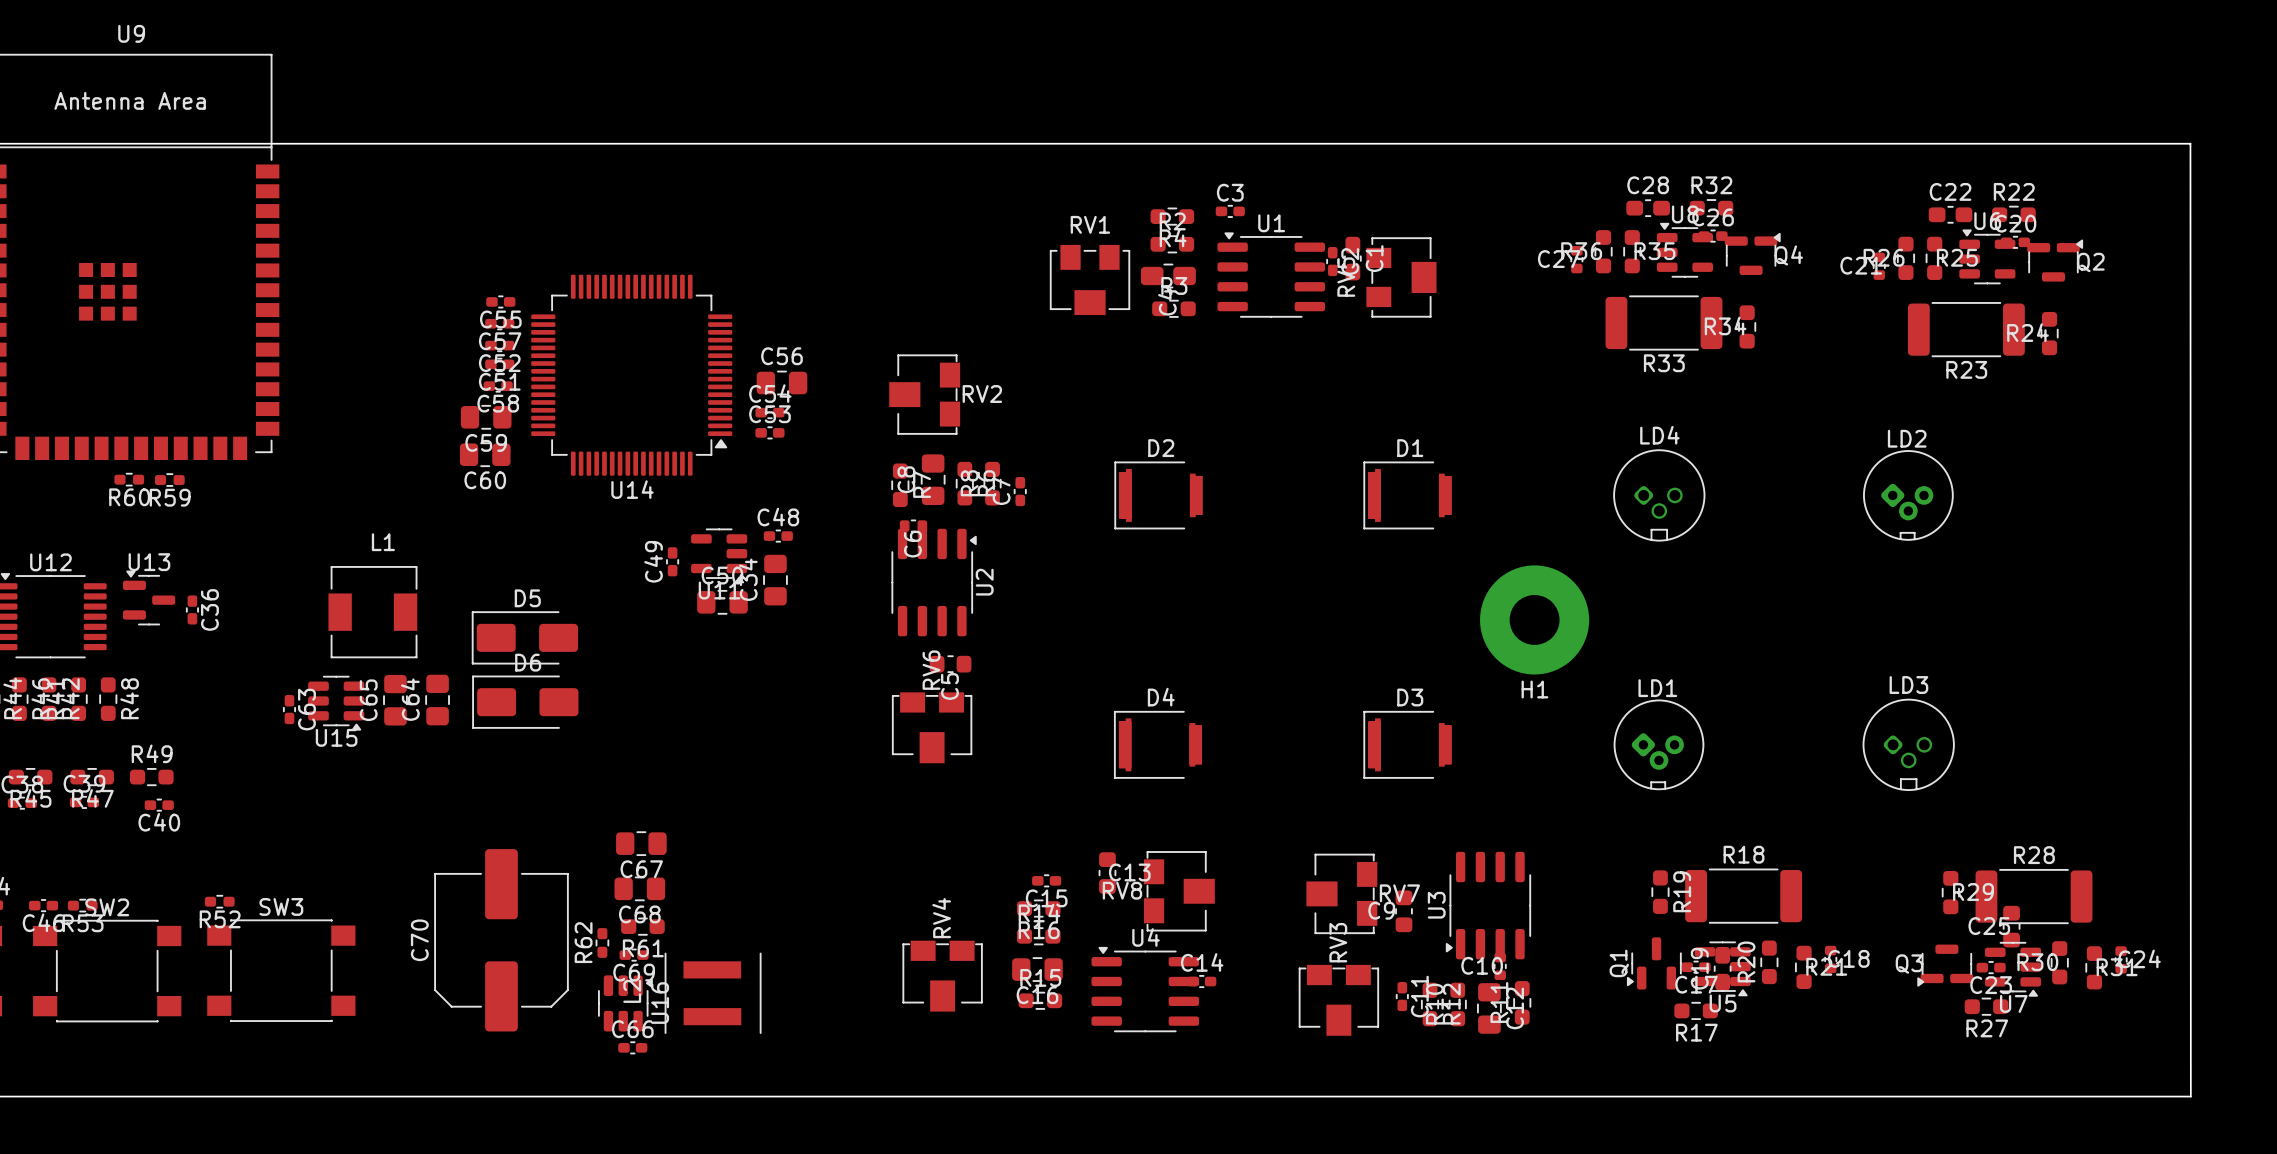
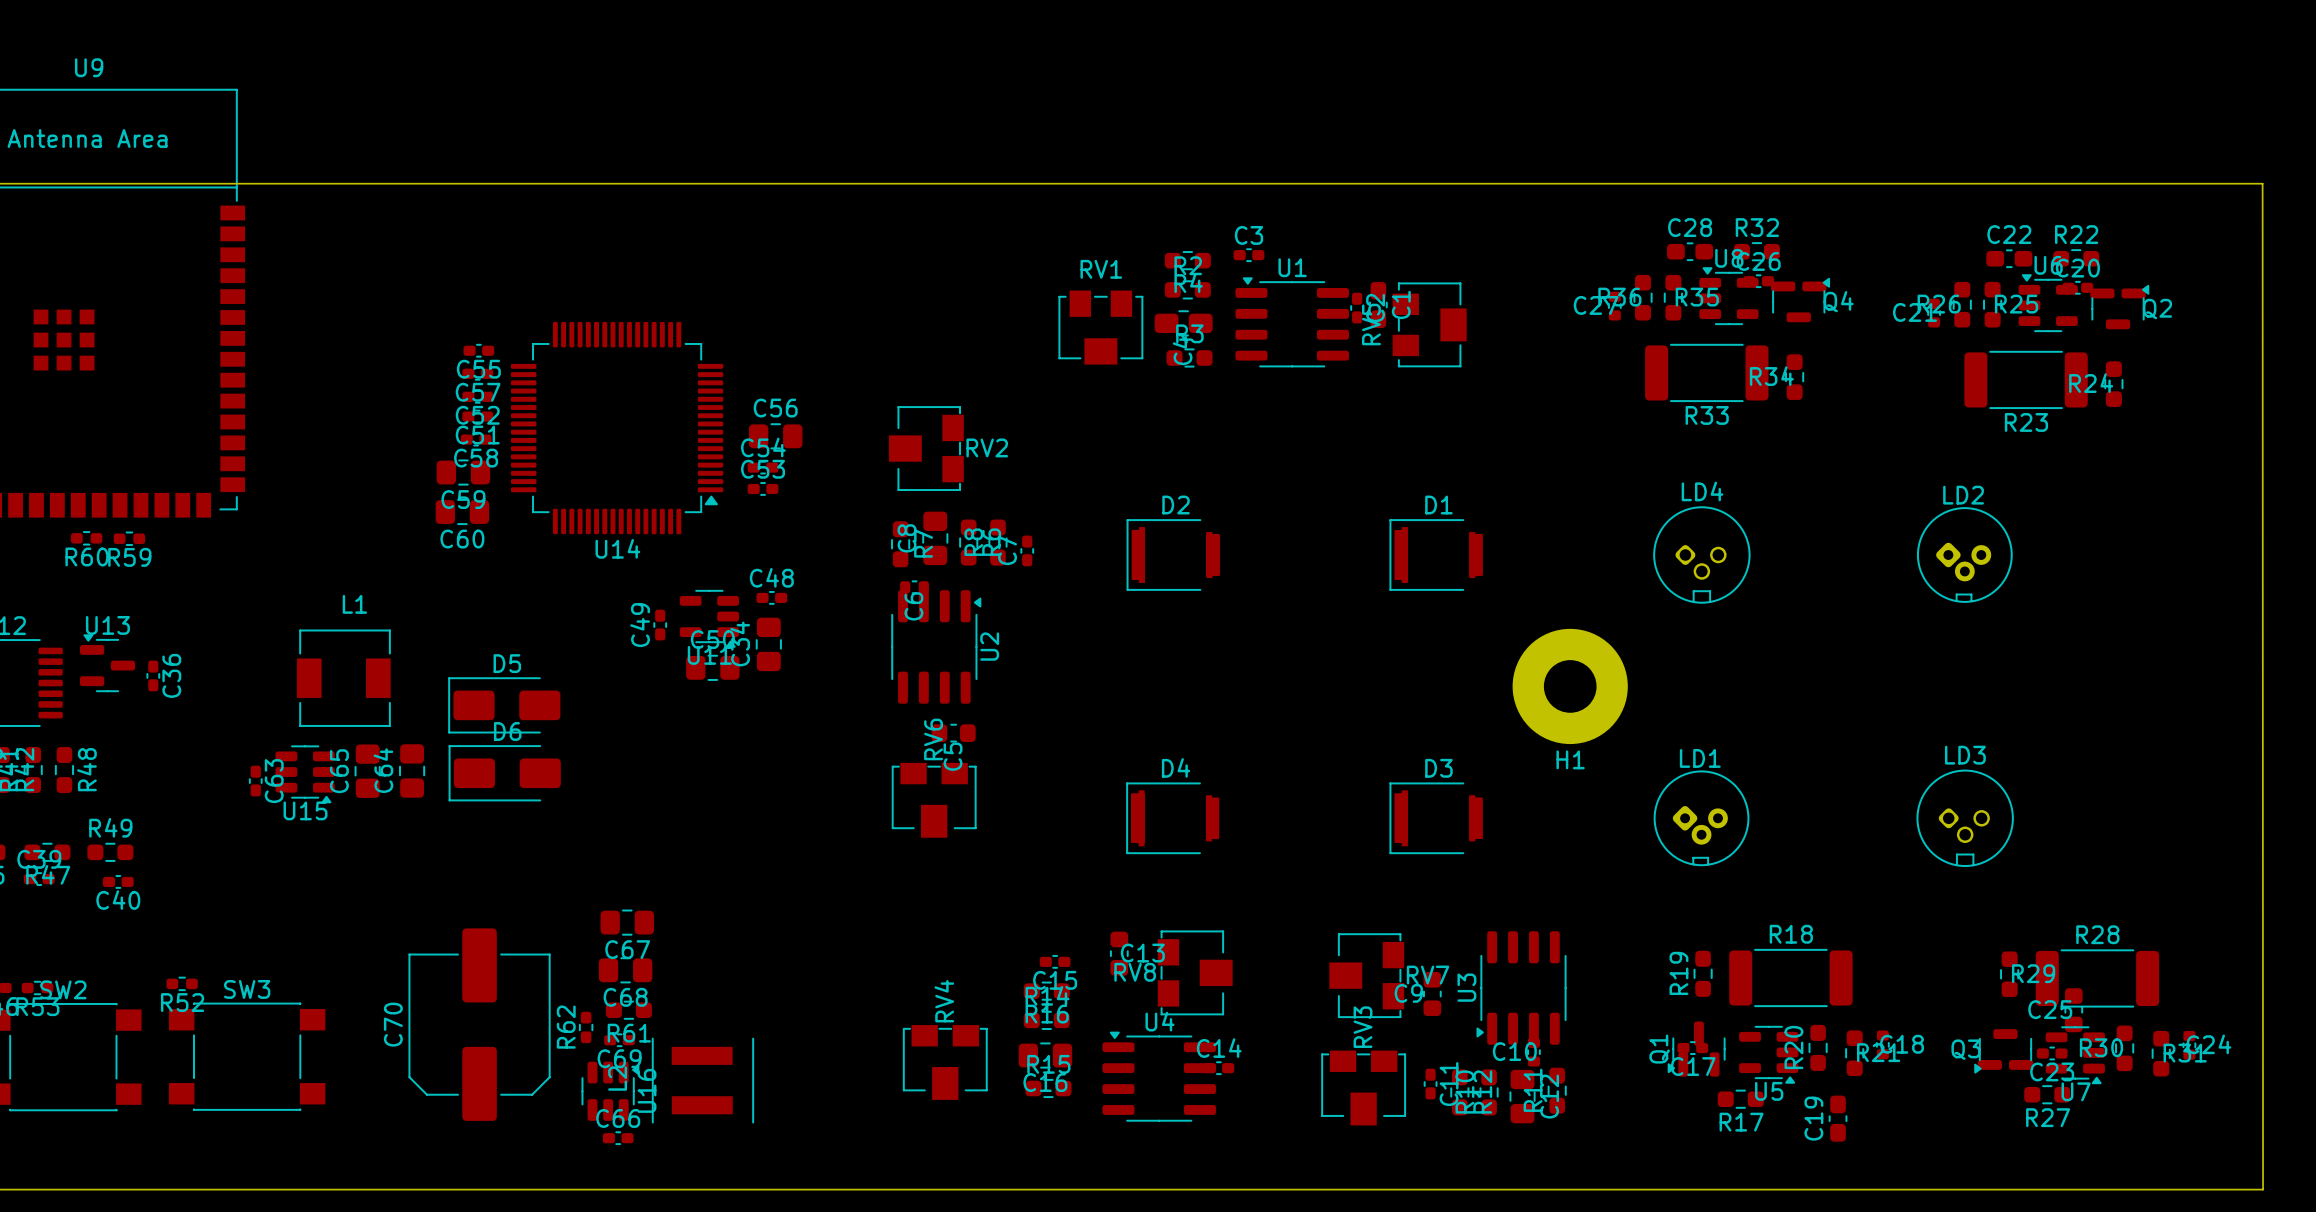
R19 name position: R19 (1682, 891) -> R19 (1678, 973)
C17 position: (1696, 967) -> (1692, 1048)
C19 position: (1722, 968) -> (1838, 1118)

